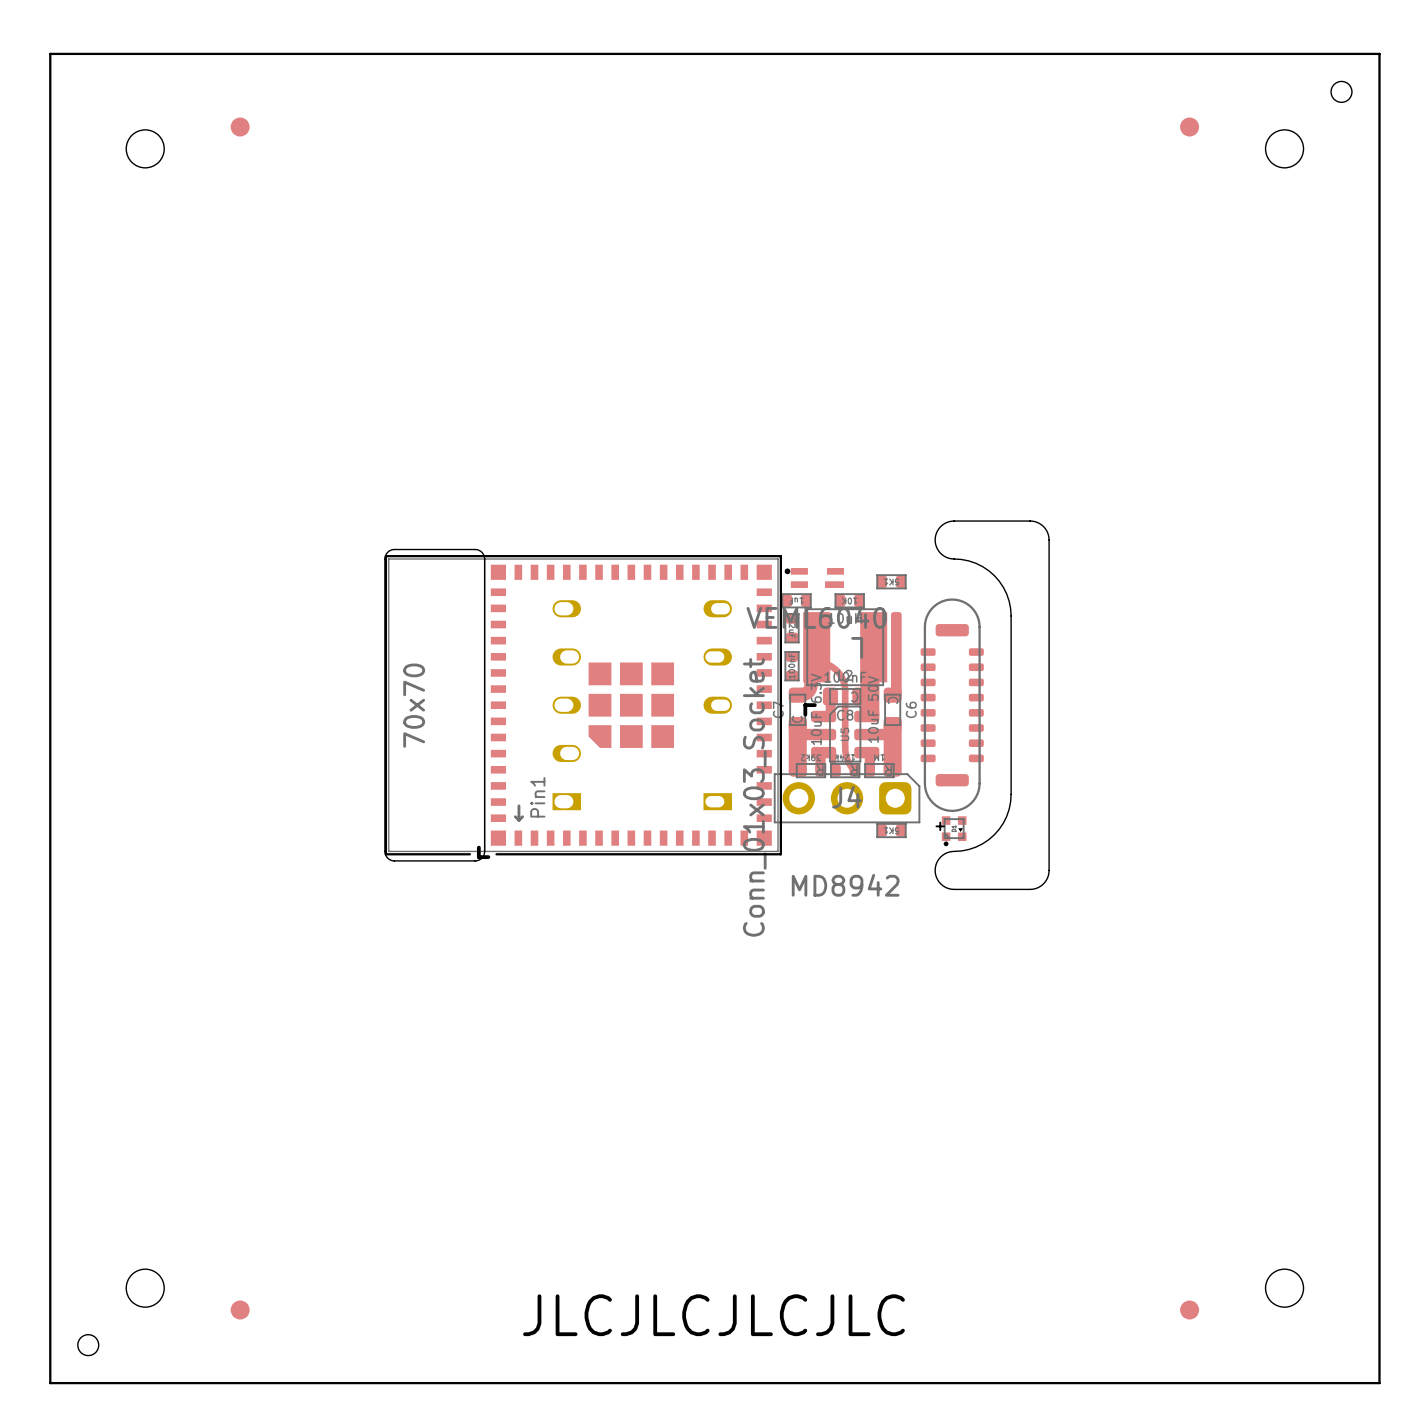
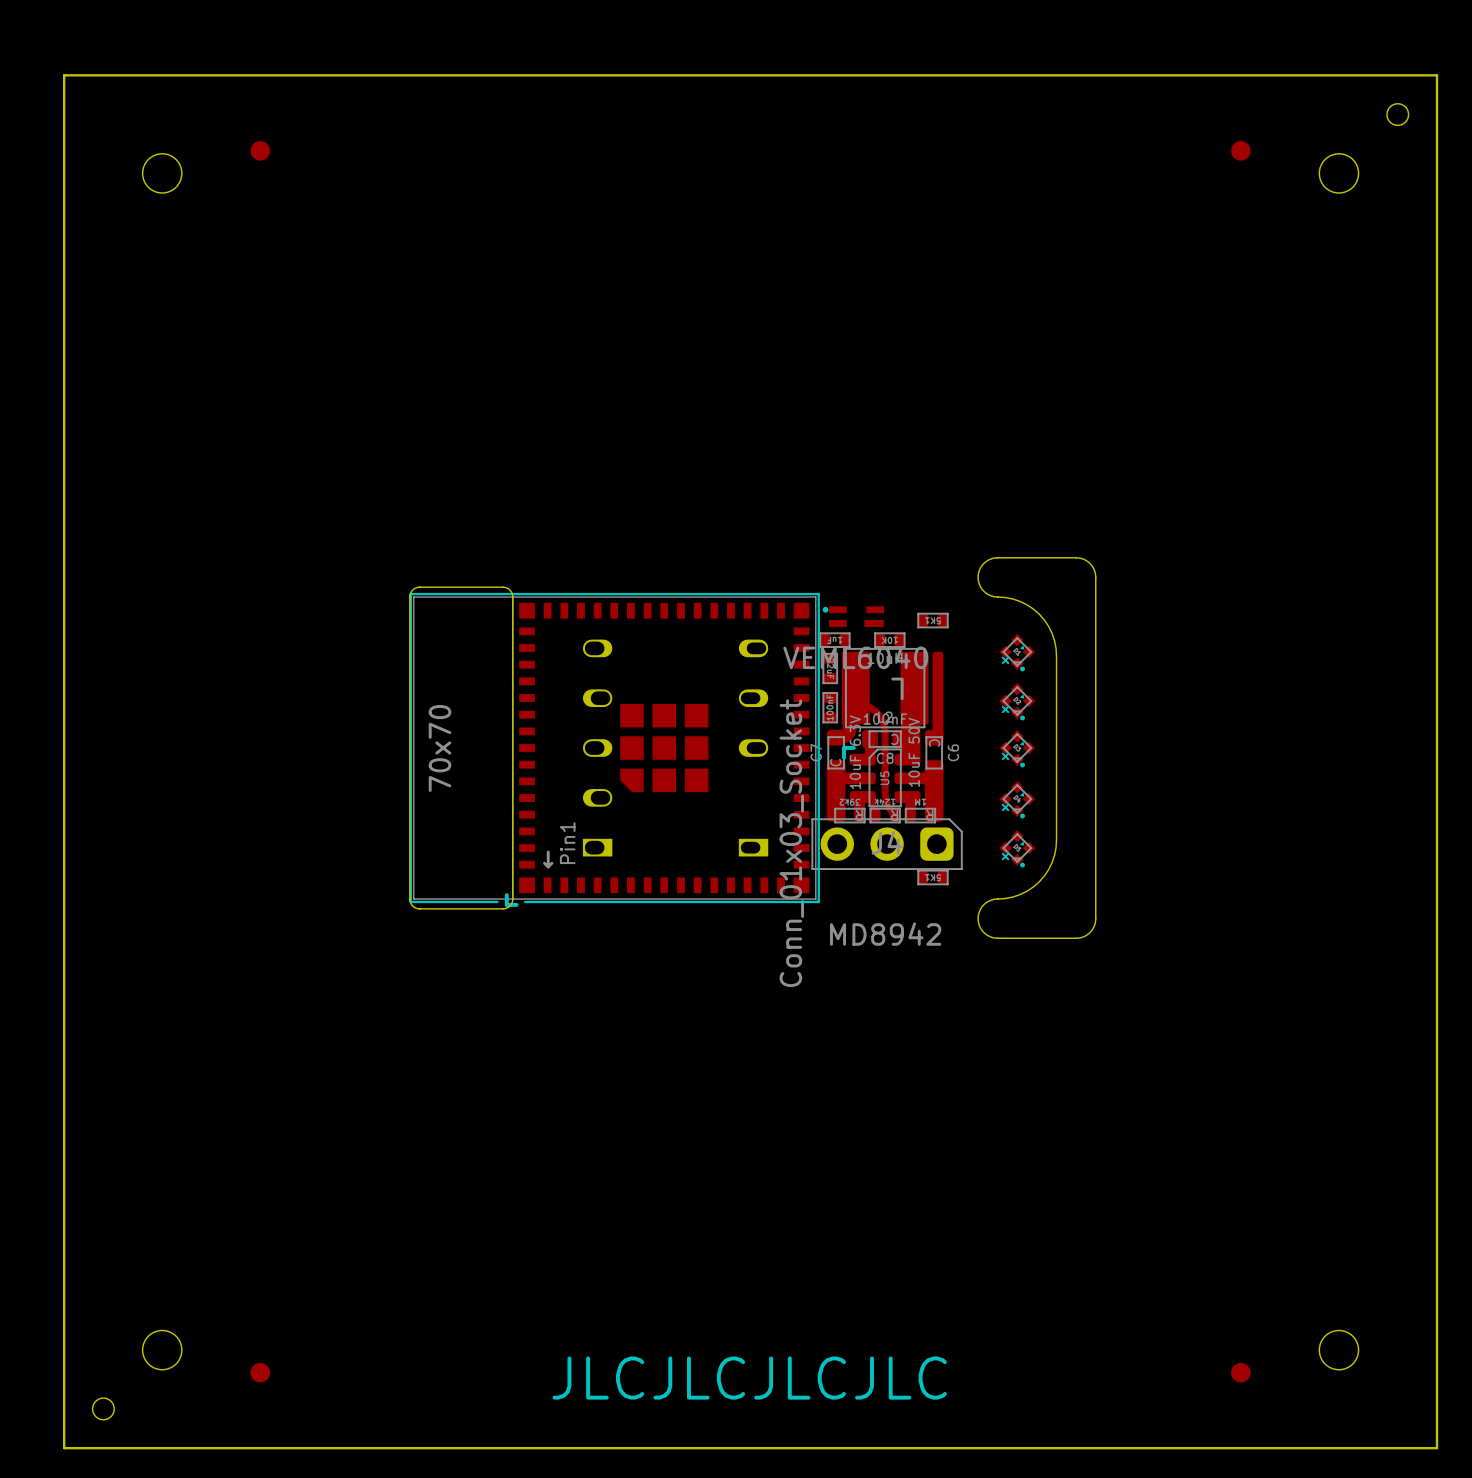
part: none -> (1017, 701)
part: (952, 705) -> none
part: none -> (1017, 748)
part: none -> (1017, 799)
part: none -> (1017, 848)
part rotation: 0° (951, 831) -> 45° counterclockwise (1017, 652)
part position: (951, 831) -> (1017, 652)

